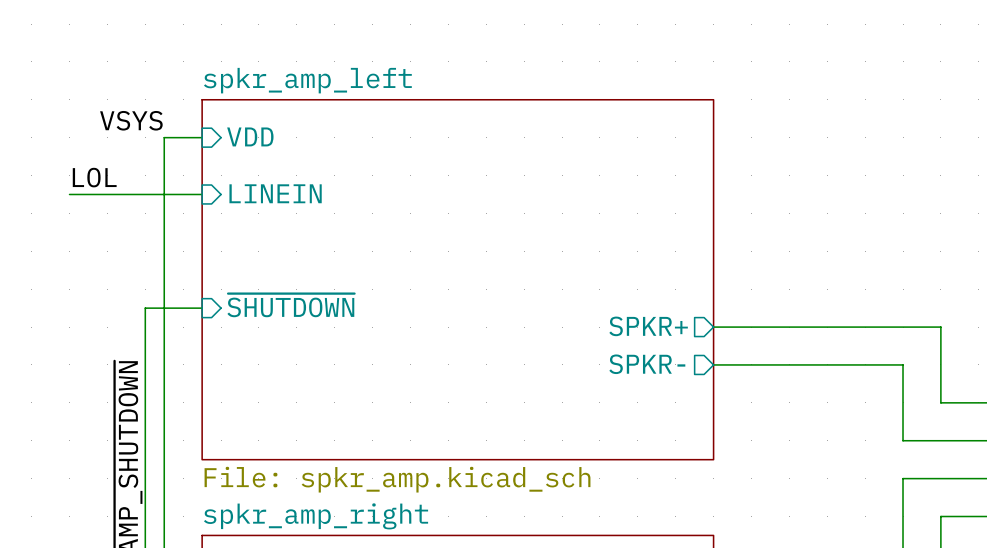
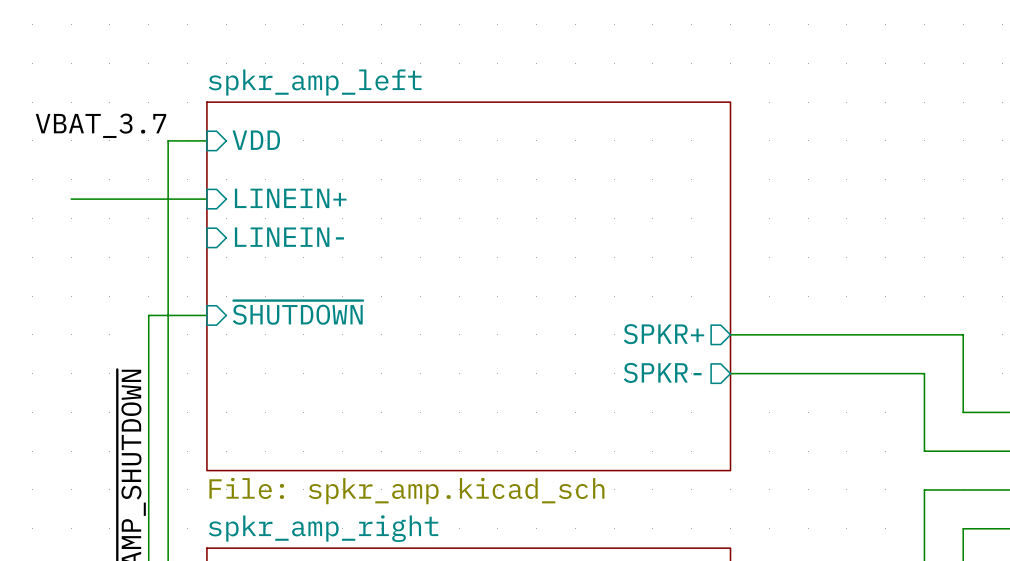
label: VSYS (131, 120) -> VBAT_3.7 (101, 125)
label: LOL (94, 177) -> none
sheet pin: LINEIN (275, 193) -> LINEIN+ (290, 198)
sheet pin: none -> LINEIN- (289, 237)

